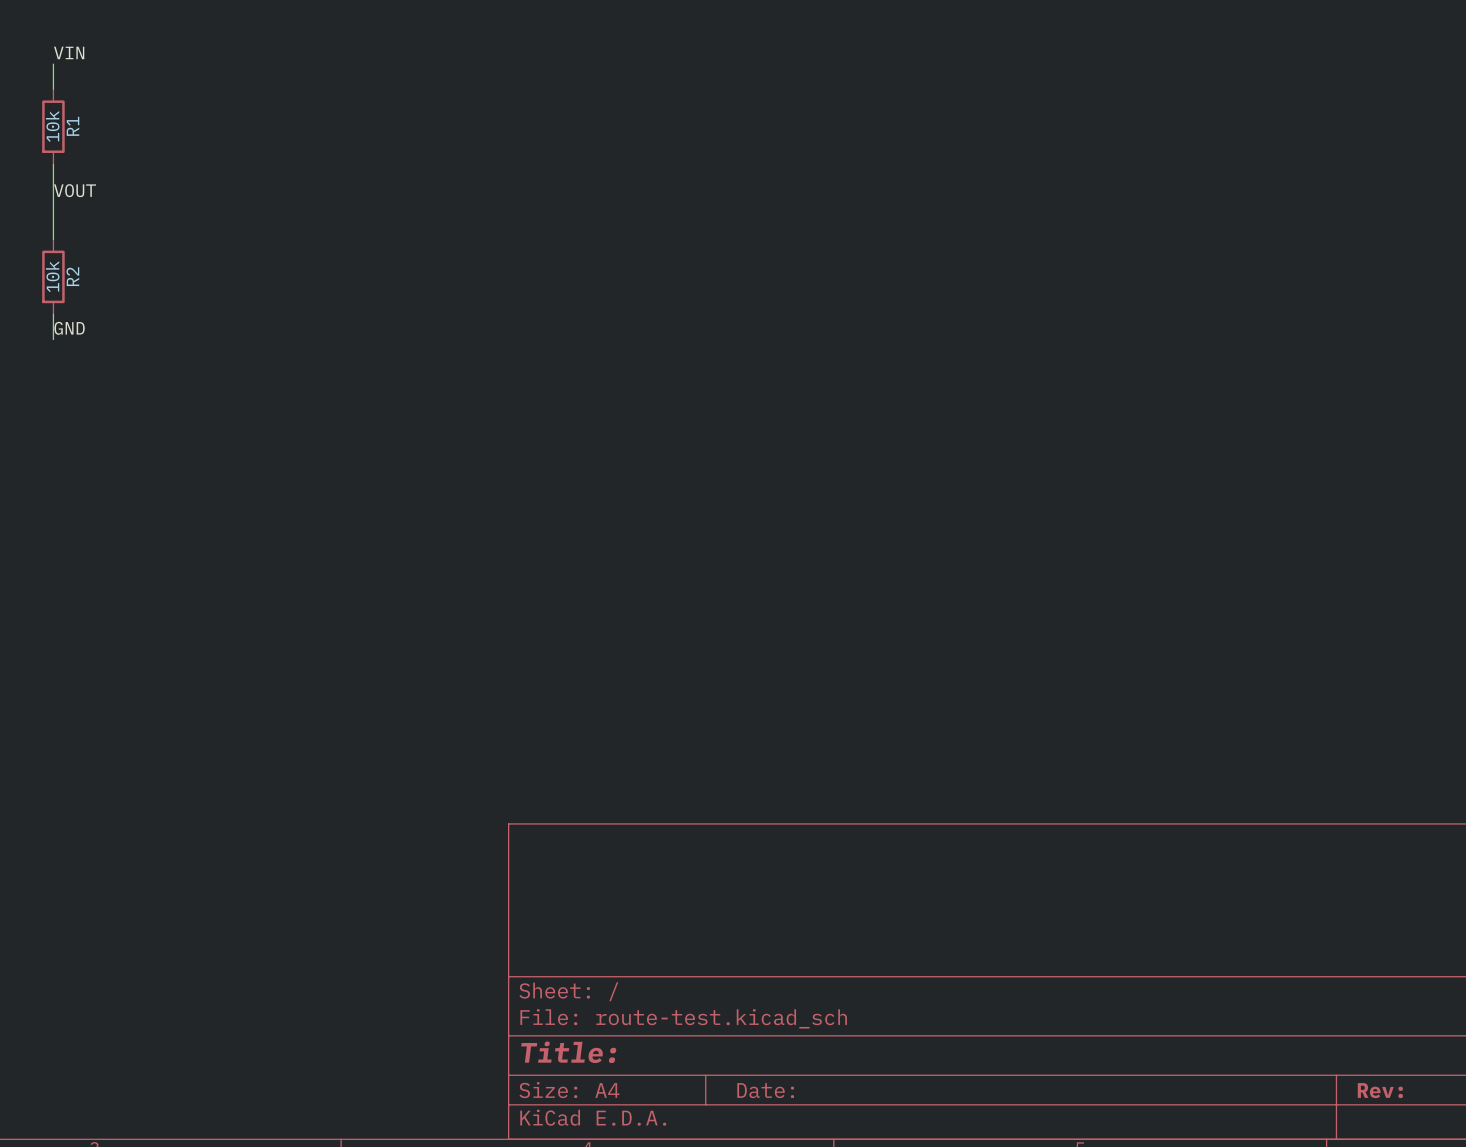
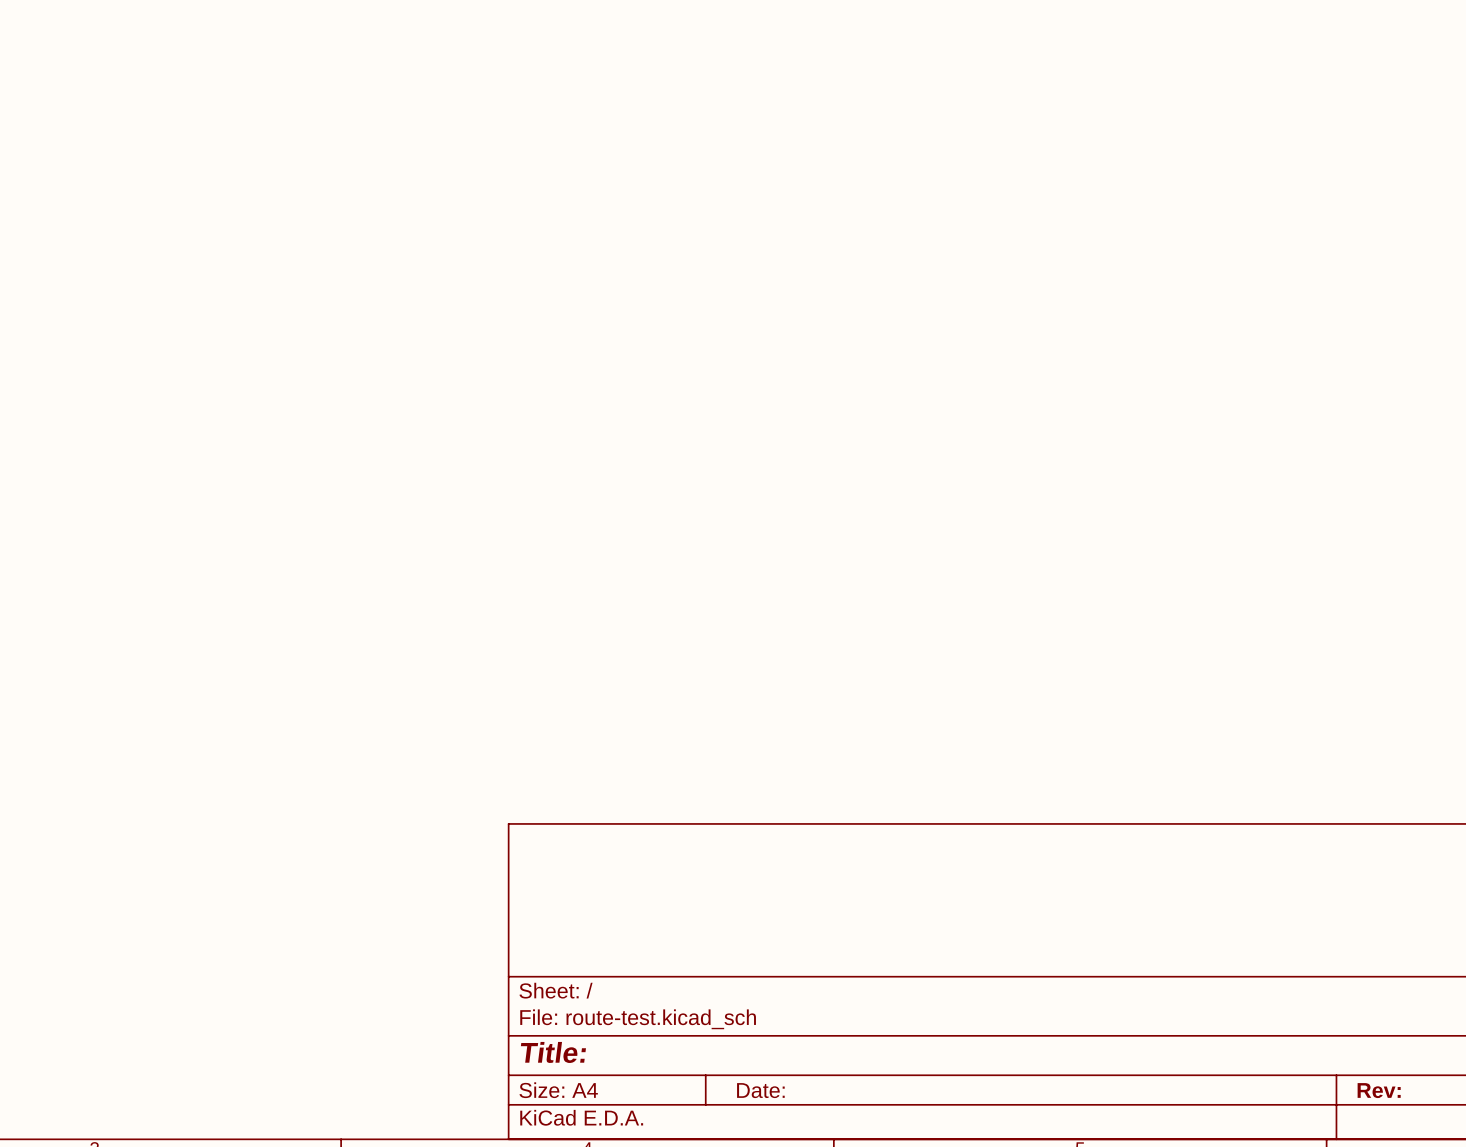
label: VIN (69, 52) -> none
wire: (53, 64) (53, 89) -> none
R1: 10k (53, 126) -> none
wire: (53, 164) (53, 239) -> none
label: VOUT (75, 190) -> none
R2: 10k (53, 276) -> none
wire: (53, 314) (53, 339) -> none
label: GND (69, 328) -> none

